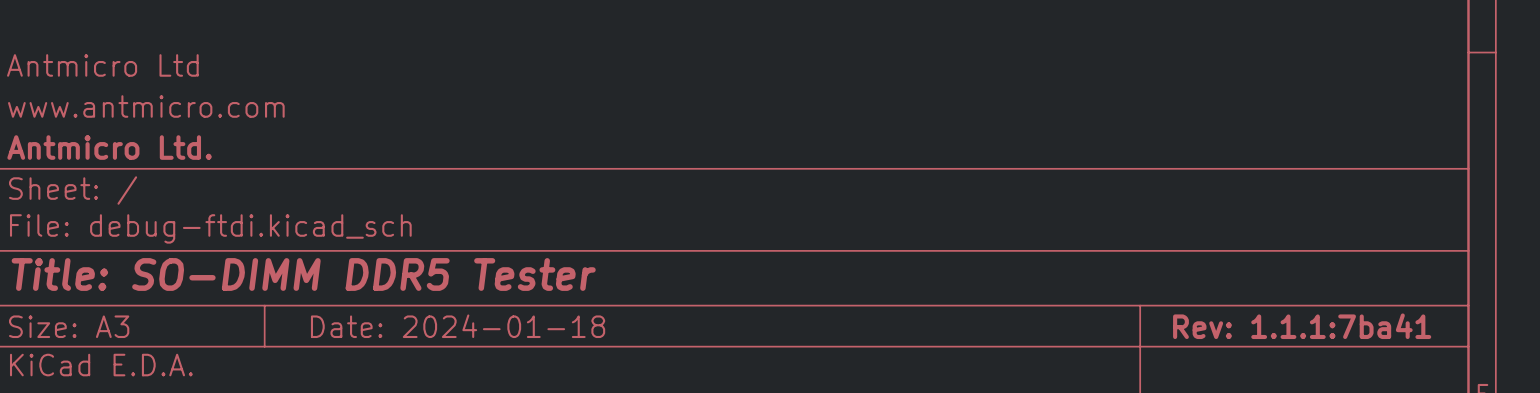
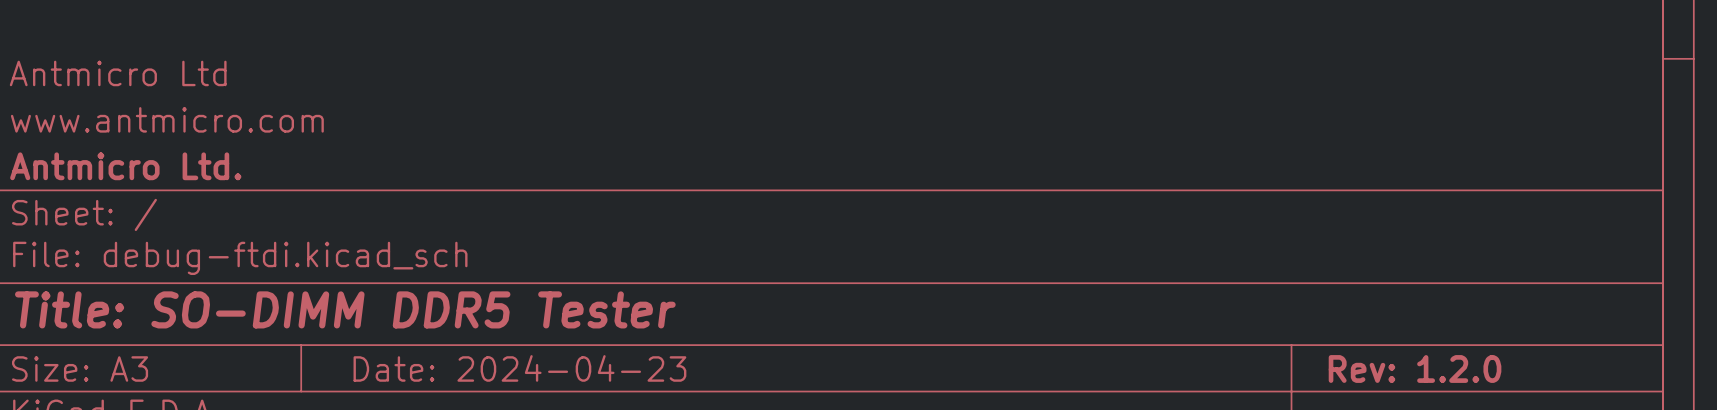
title block: Date: 2024-01-18 (458, 326) -> Date: 2024-04-23 (519, 368)
title block: Rev: 1.1.1:7ba41 (1302, 326) -> Rev: 1.2.0 (1415, 368)

